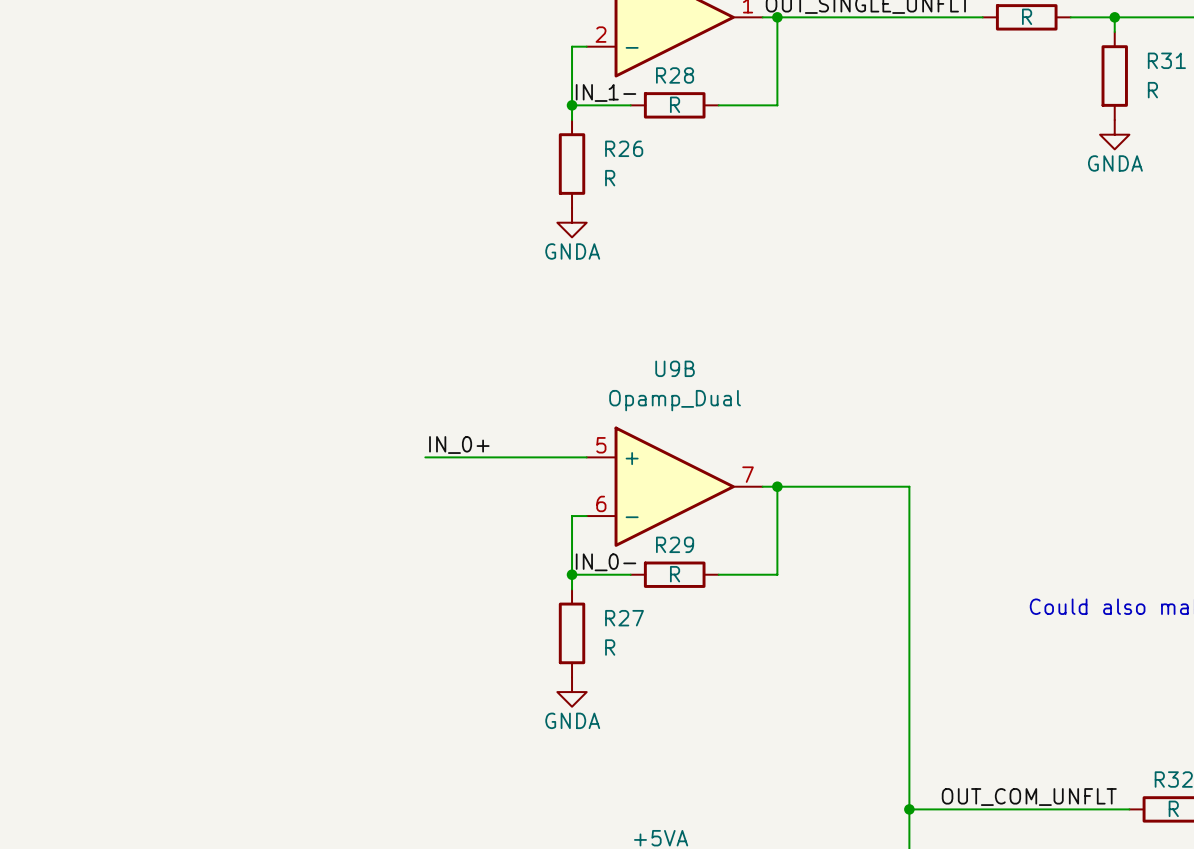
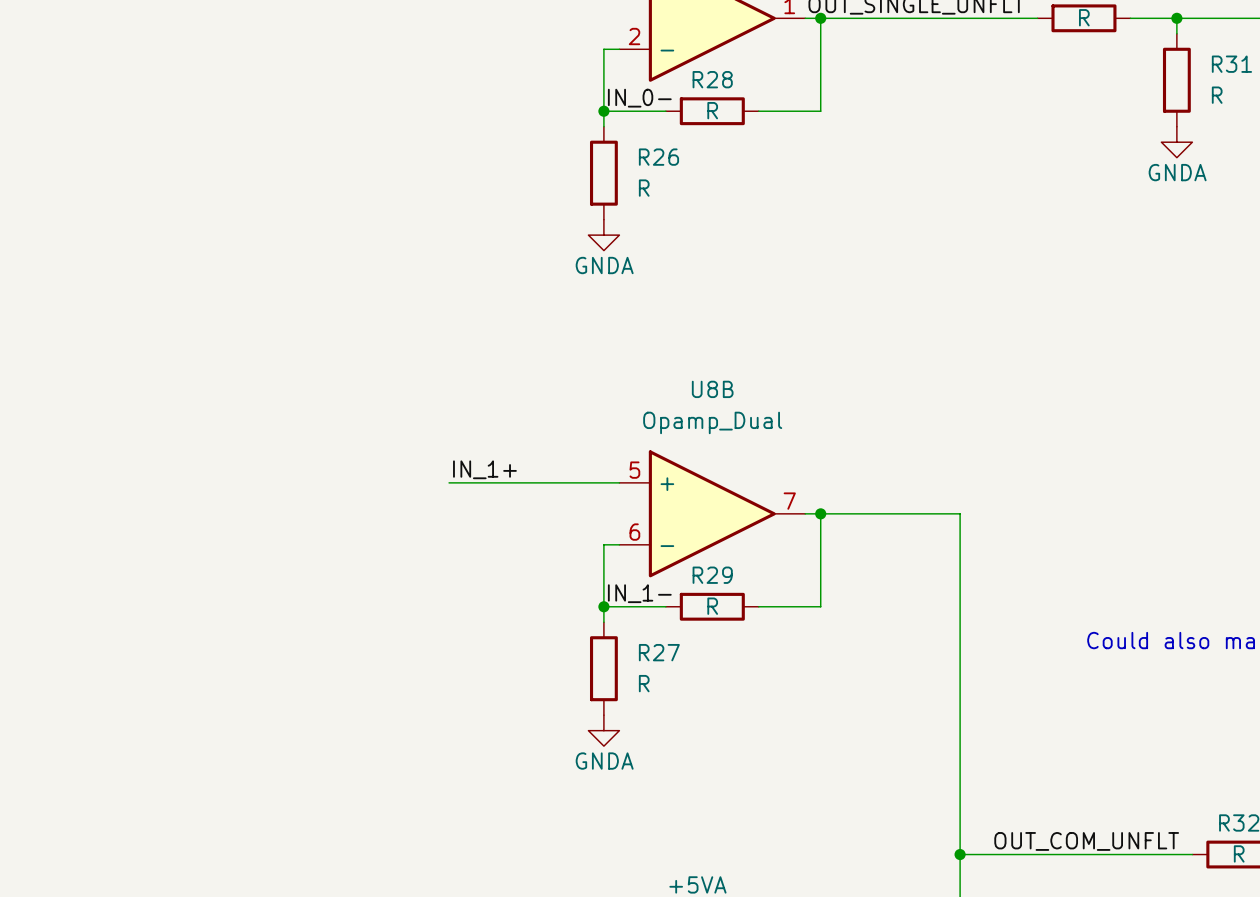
label: IN_1- (606, 92) -> IN_0- (639, 98)
U9B name: U9B (675, 368) -> U8B (712, 389)
label: IN_0+ (459, 444) -> IN_1+ (484, 469)
label: IN_0- (606, 562) -> IN_1- (639, 593)

